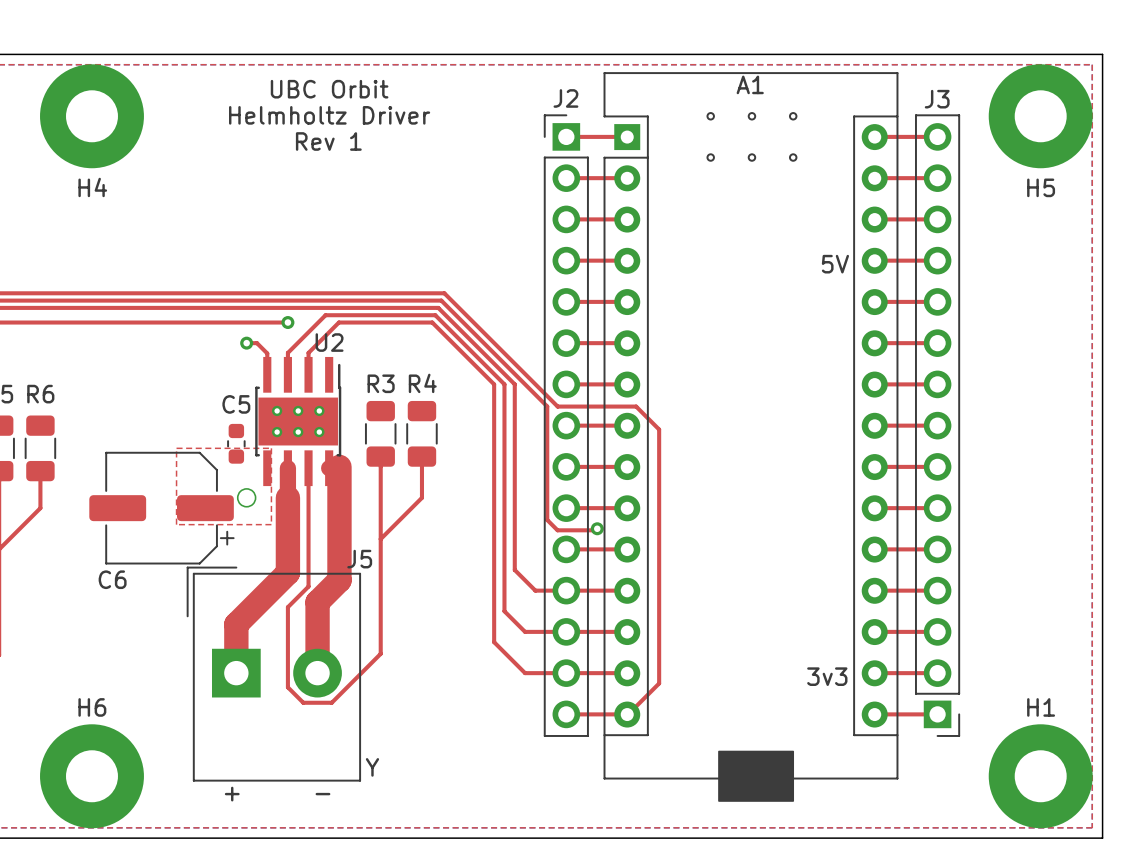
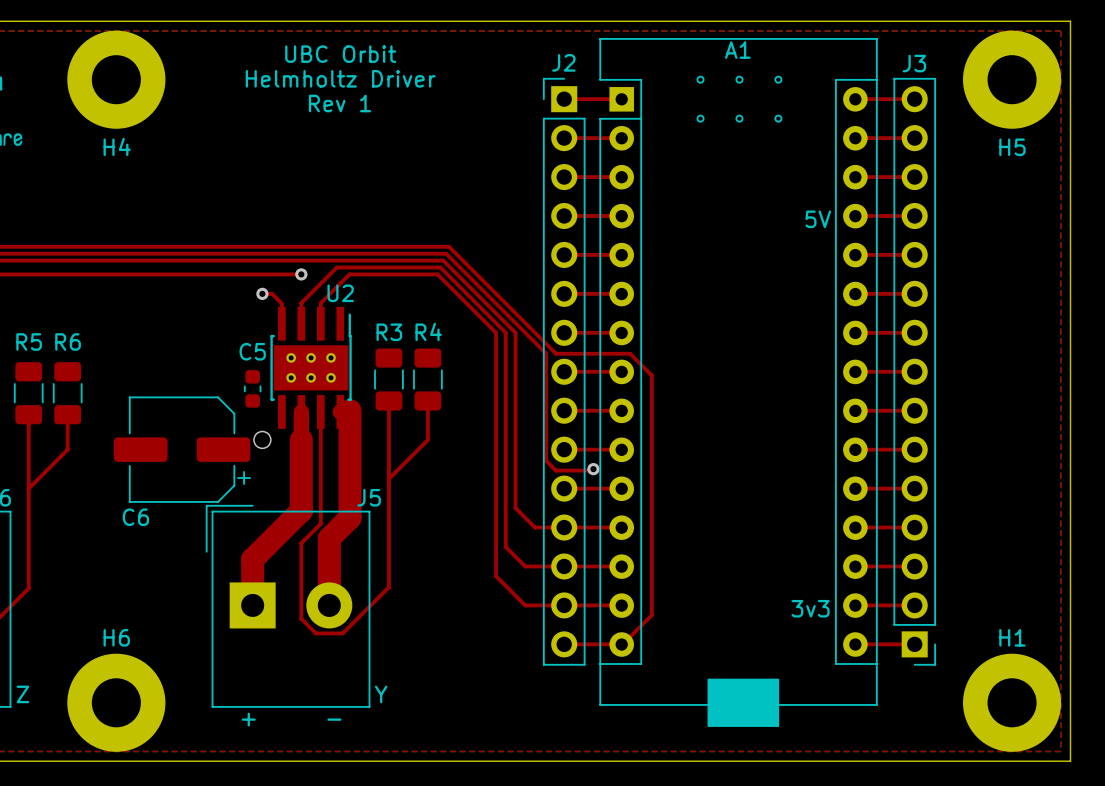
top zone outline: (176, 448) (176, 524) (271, 524) (271, 448) (176, 448) -> none

